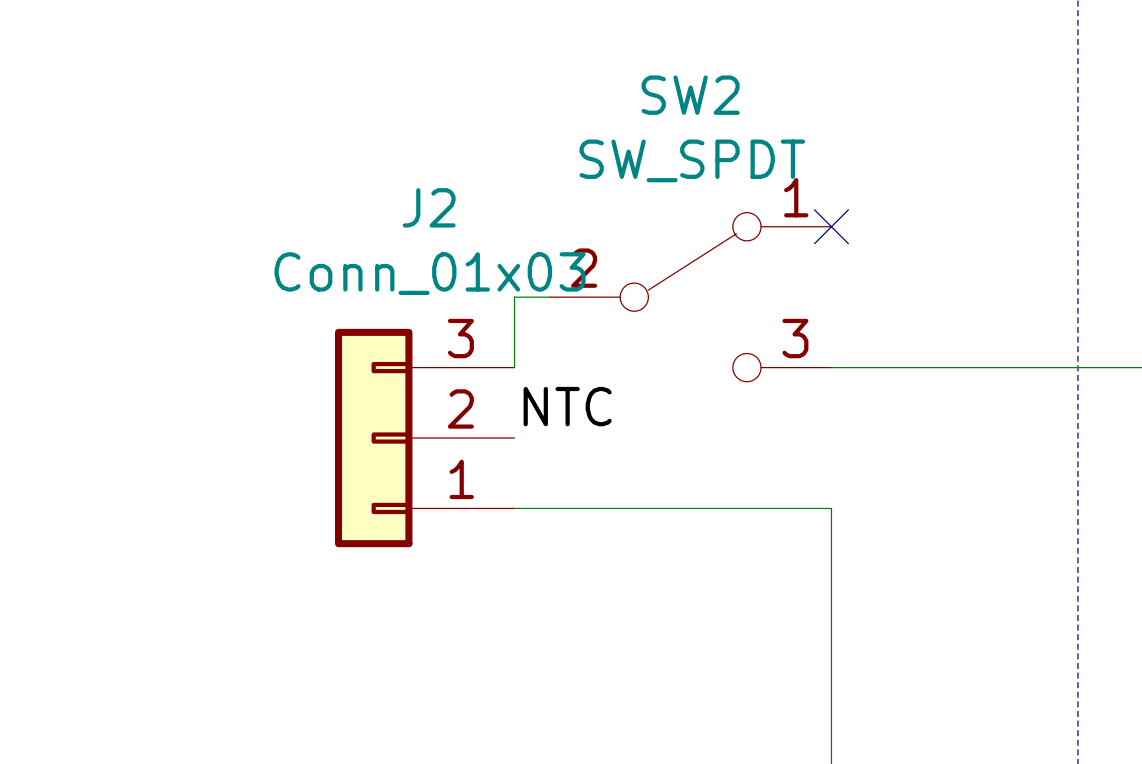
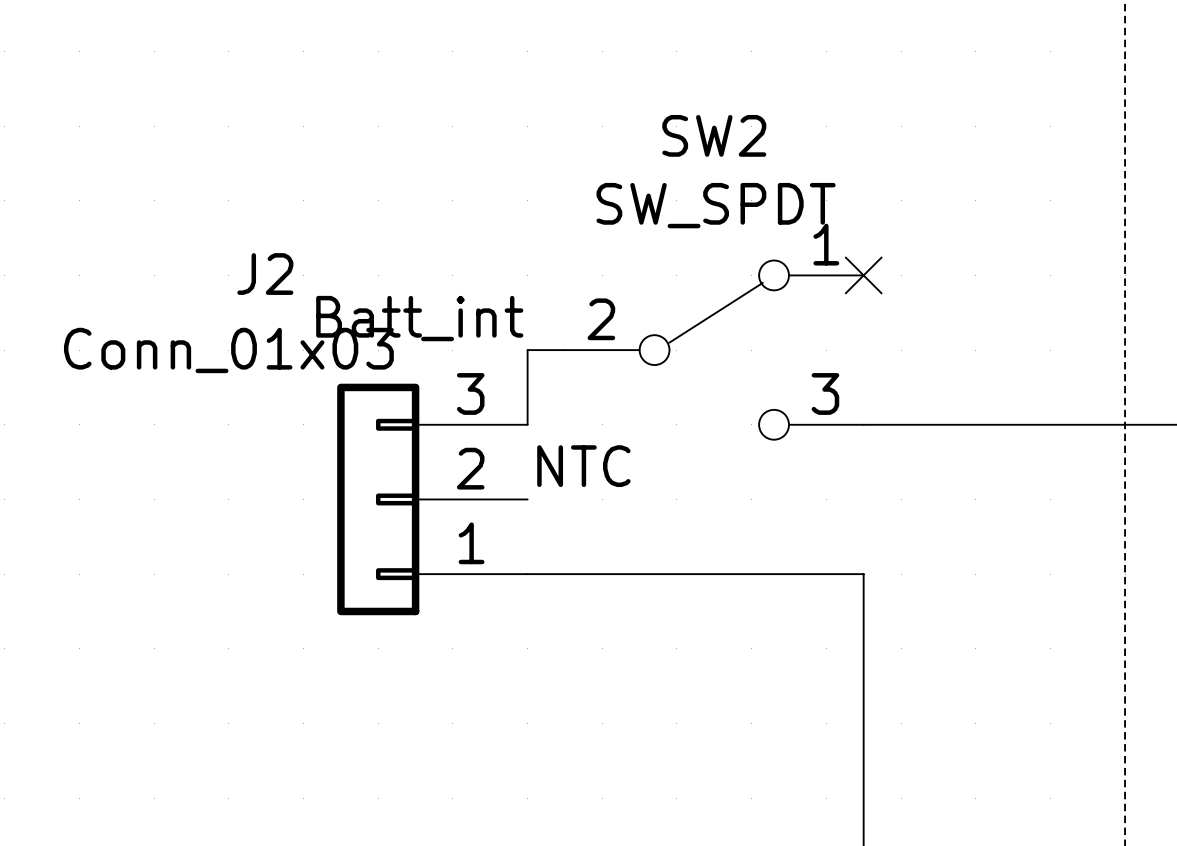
J2 name position: J2 (429, 207) -> J2 (265, 274)
label: none -> Batt_int (419, 318)
J2 value position: Conn_01x03 (430, 273) -> Conn_01x03 (228, 350)

